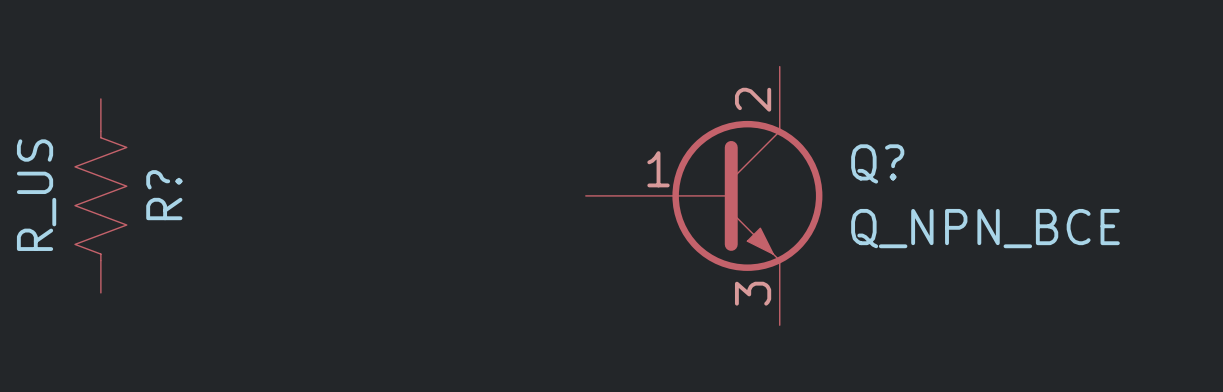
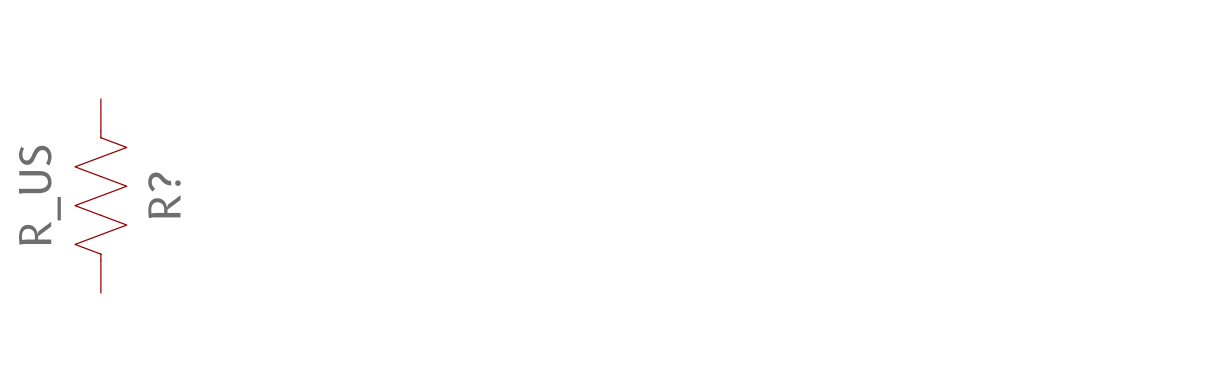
Q?: Q_NPN_BCE (704, 195) -> none

